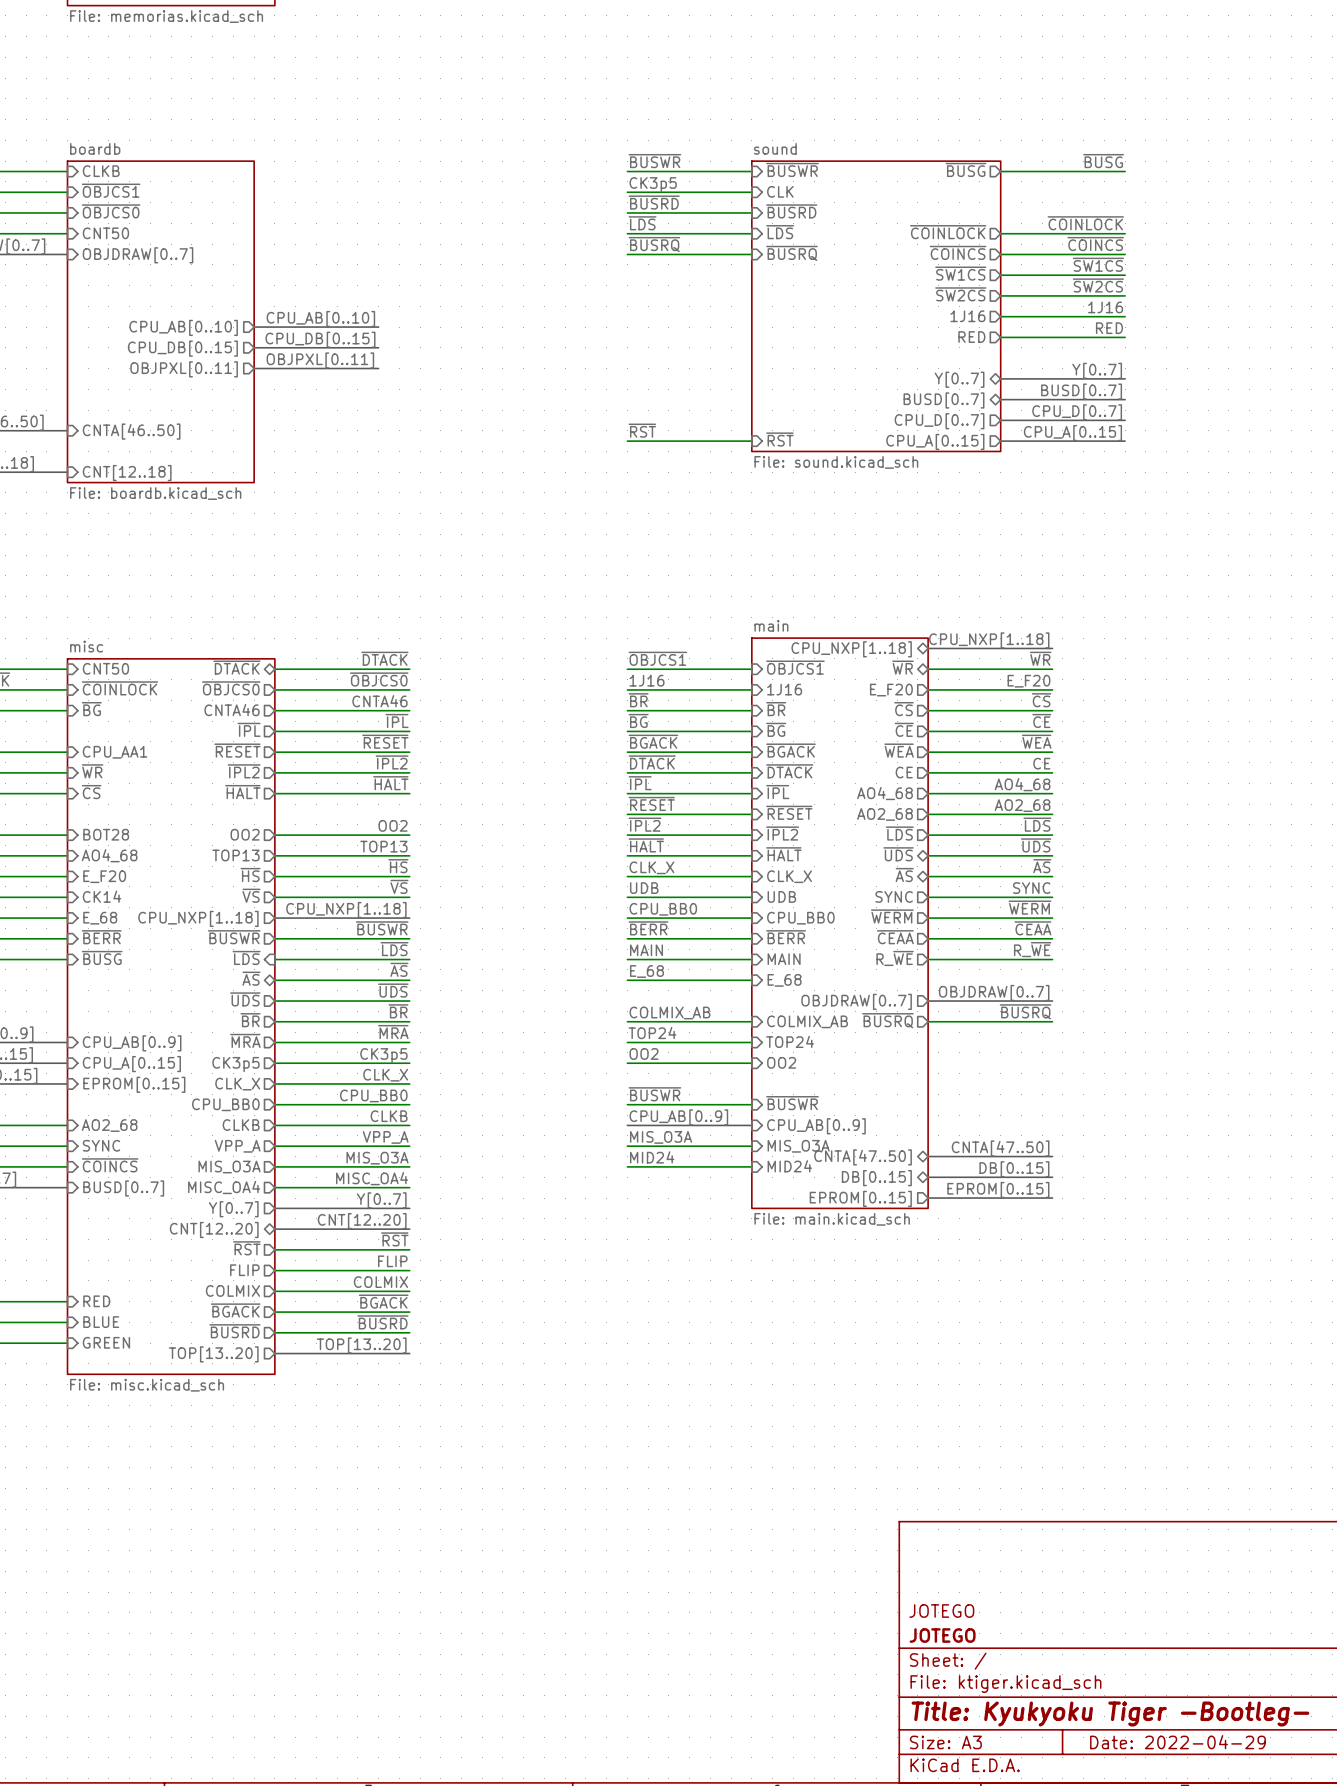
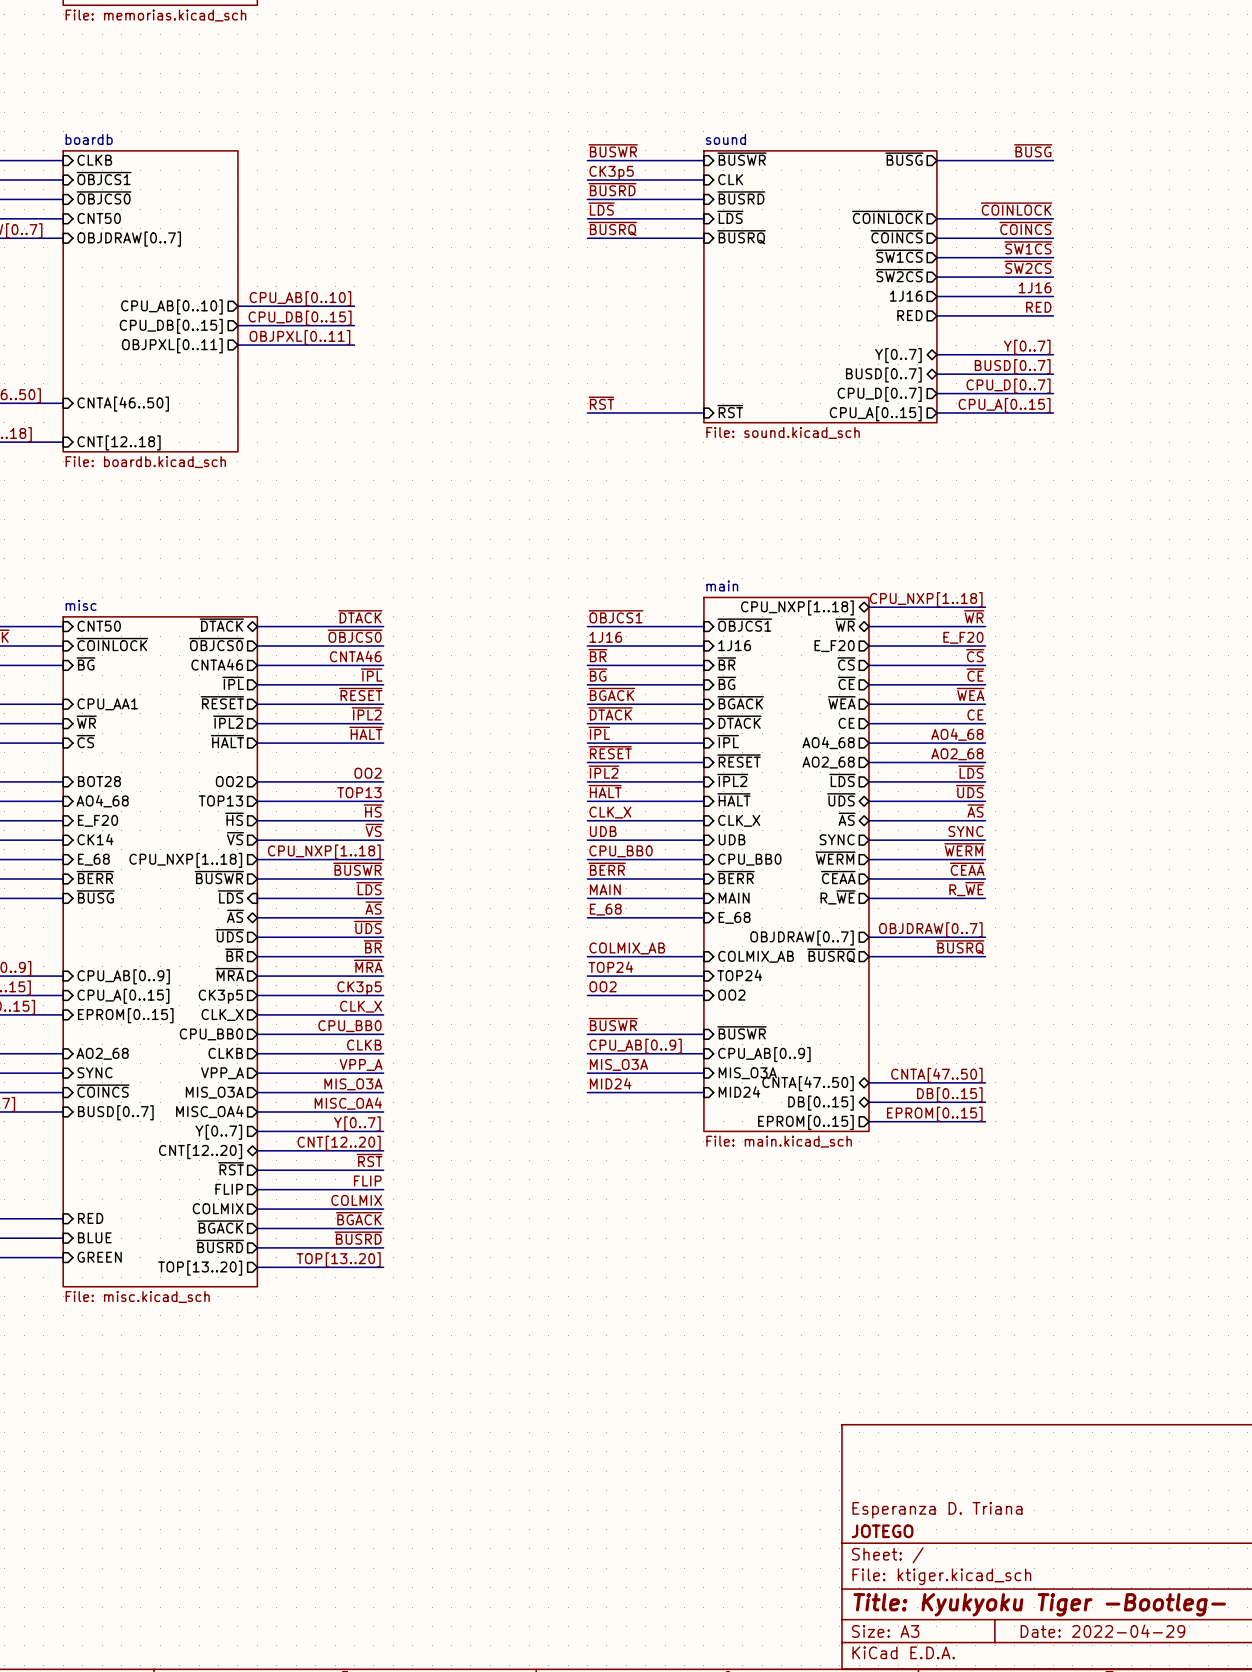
title block: JOTEGO (941, 1611) -> Esperanza D. Triana (937, 1510)

